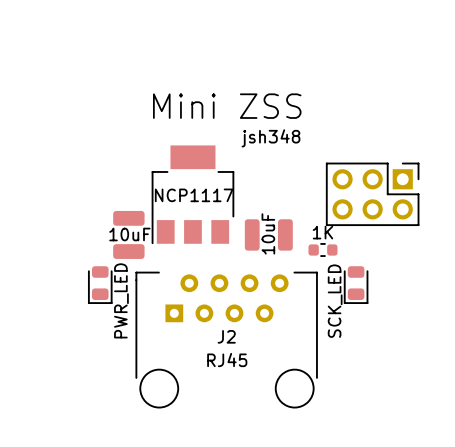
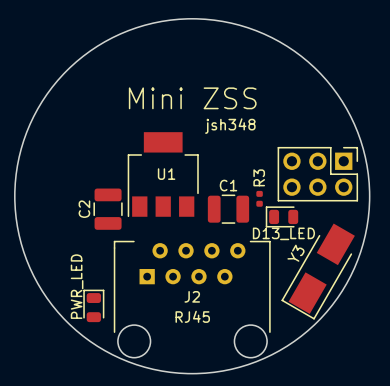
round board edge: none -> [14, 18, 371, 375]
U1 name: none -> U1 (166, 174)
text: NCP1117 (194, 195) -> none
R3: none -> (259, 198)
part value: 1K (322, 232) -> D13_LED (283, 233)
part: 10uF (128, 234) -> none
C2: none -> (108, 209)
part: 10uF (268, 234) -> none
C1: none -> (228, 209)
part footprint: [308, 243, 338, 257] -> [265, 206, 299, 228]
part rotation: 0° (100, 285) -> 180° (93, 305)
part position: (100, 285) -> (93, 305)
part: SCK_LED (356, 285) -> none
Y3: none -> (318, 271)

